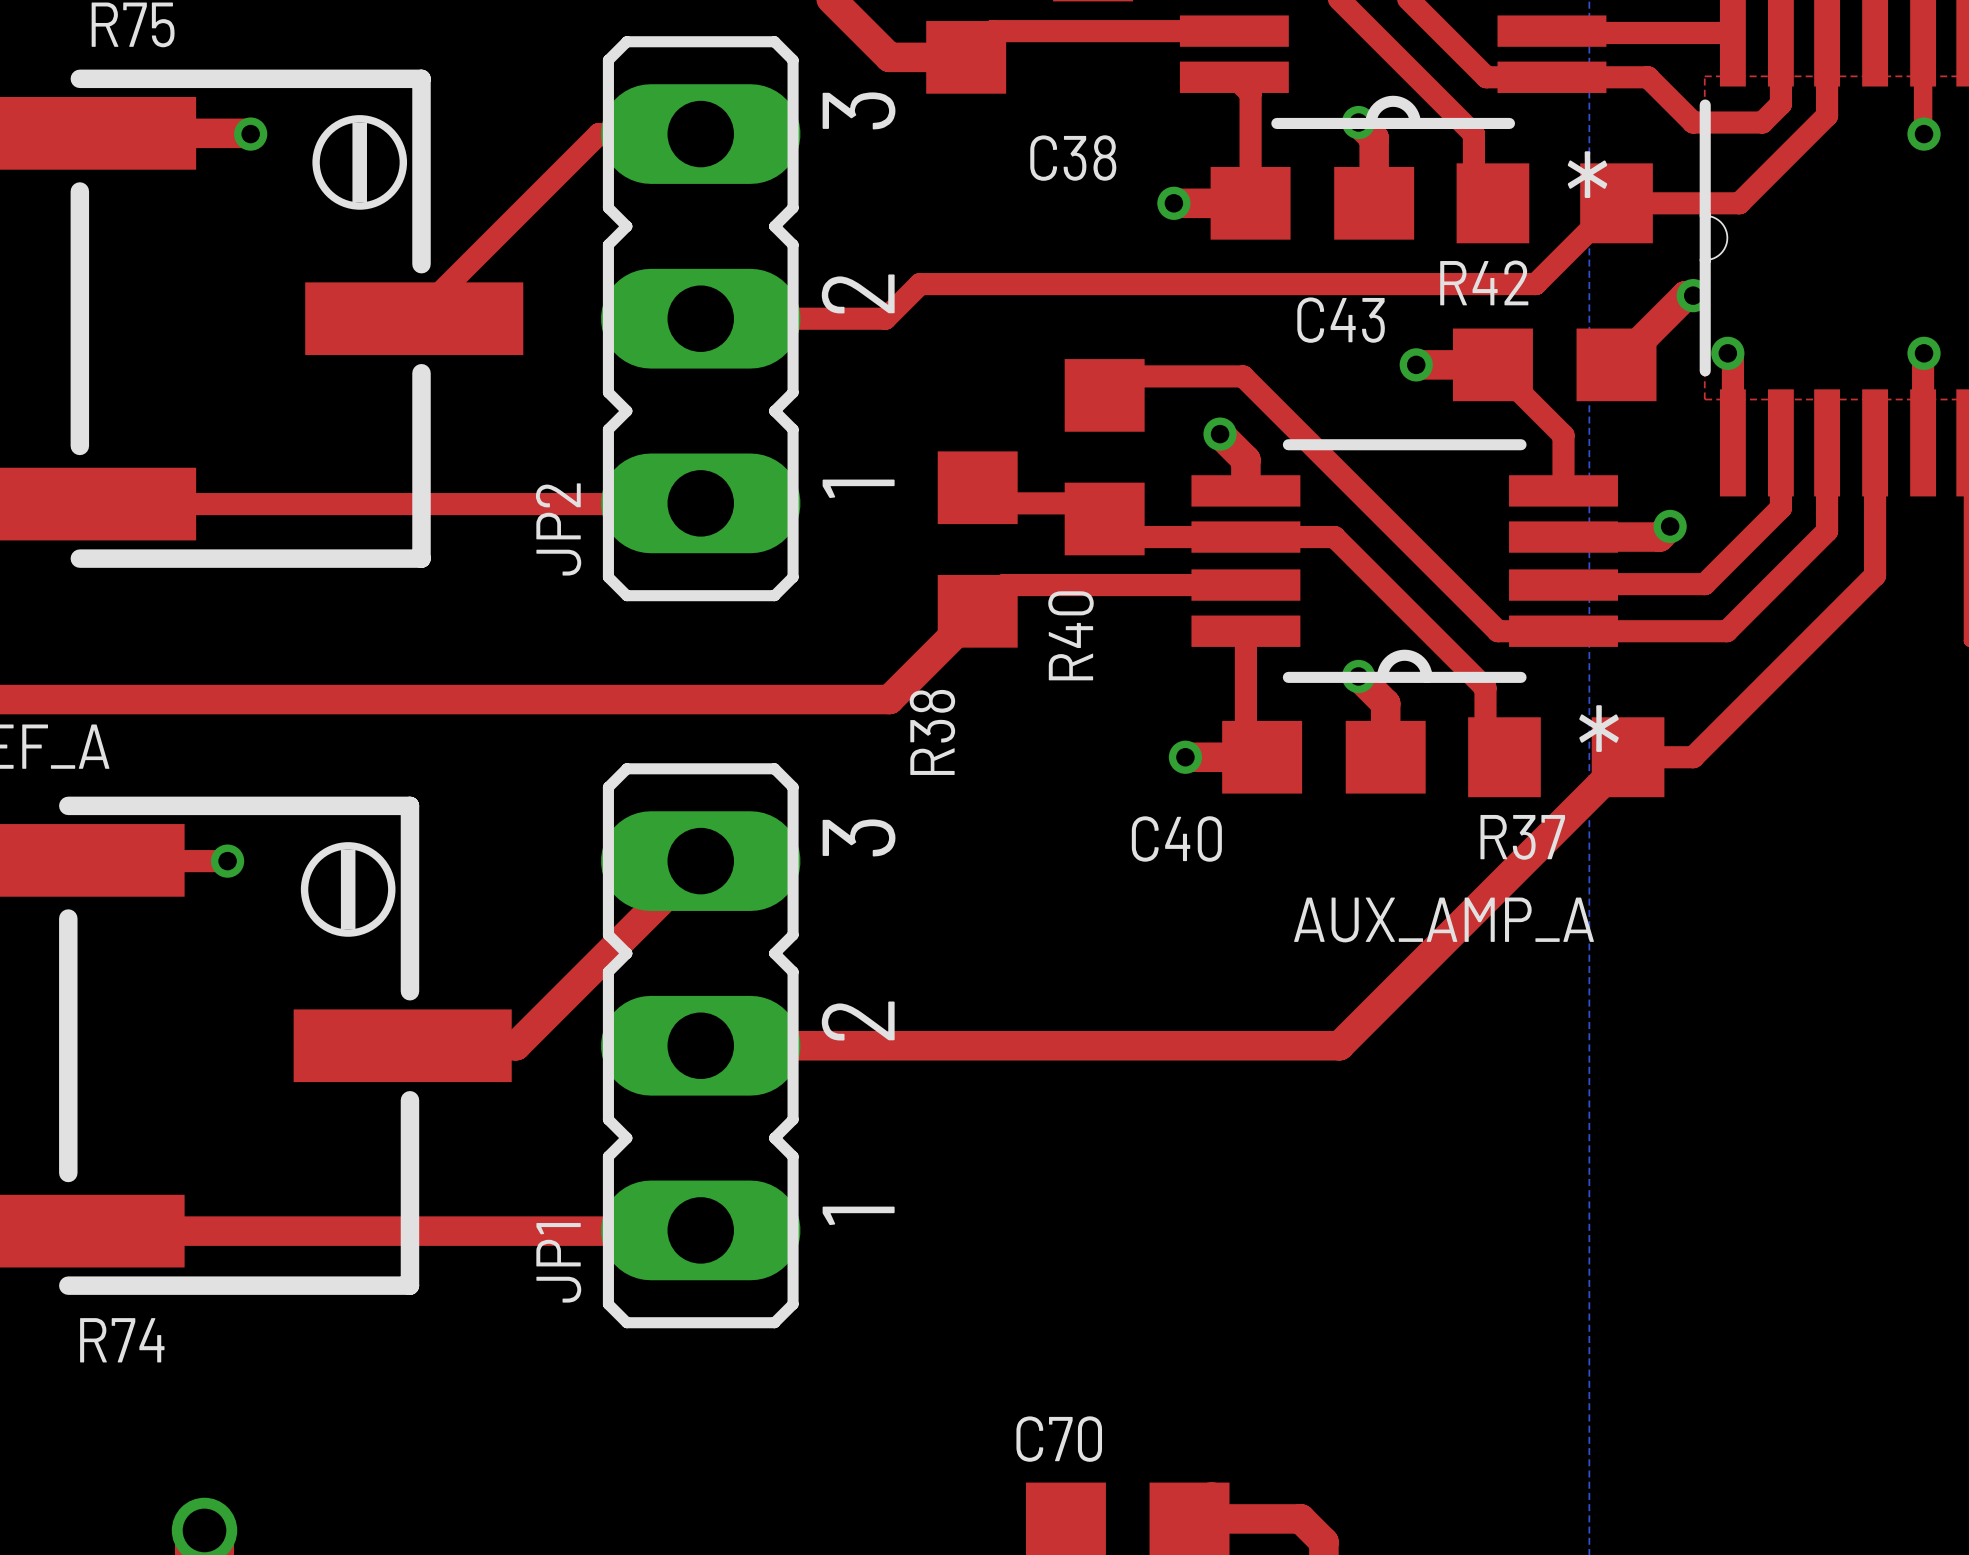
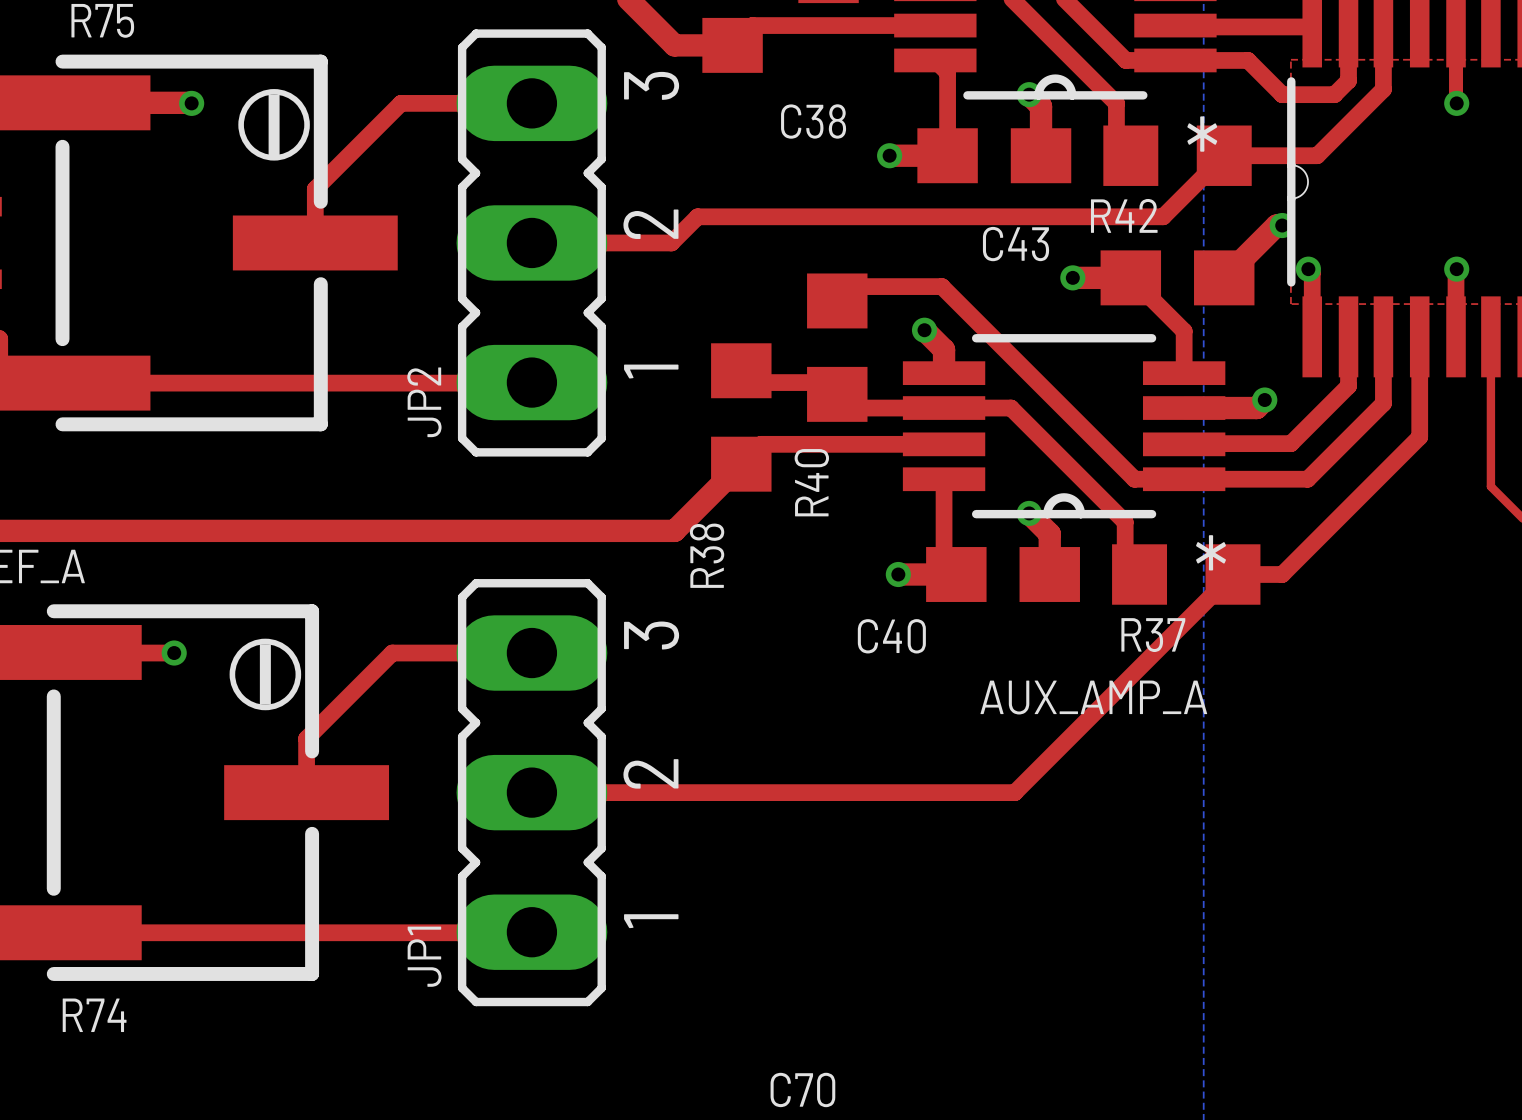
top track: (598, 134) (414, 318) -> (454, 103) (401, 103) (315, 189) (315, 242)
top track width: thick (1628, 757) (1339, 1045) (700, 1045) -> thin (1232, 574) (1014, 792) (531, 792)
top track: (700, 861) (516, 1045) (402, 1045) -> (531, 653) (392, 653) (306, 738) (306, 792)
top track width: thick (75, 1231) (700, 1231) -> thin (59, 932) (531, 932)

